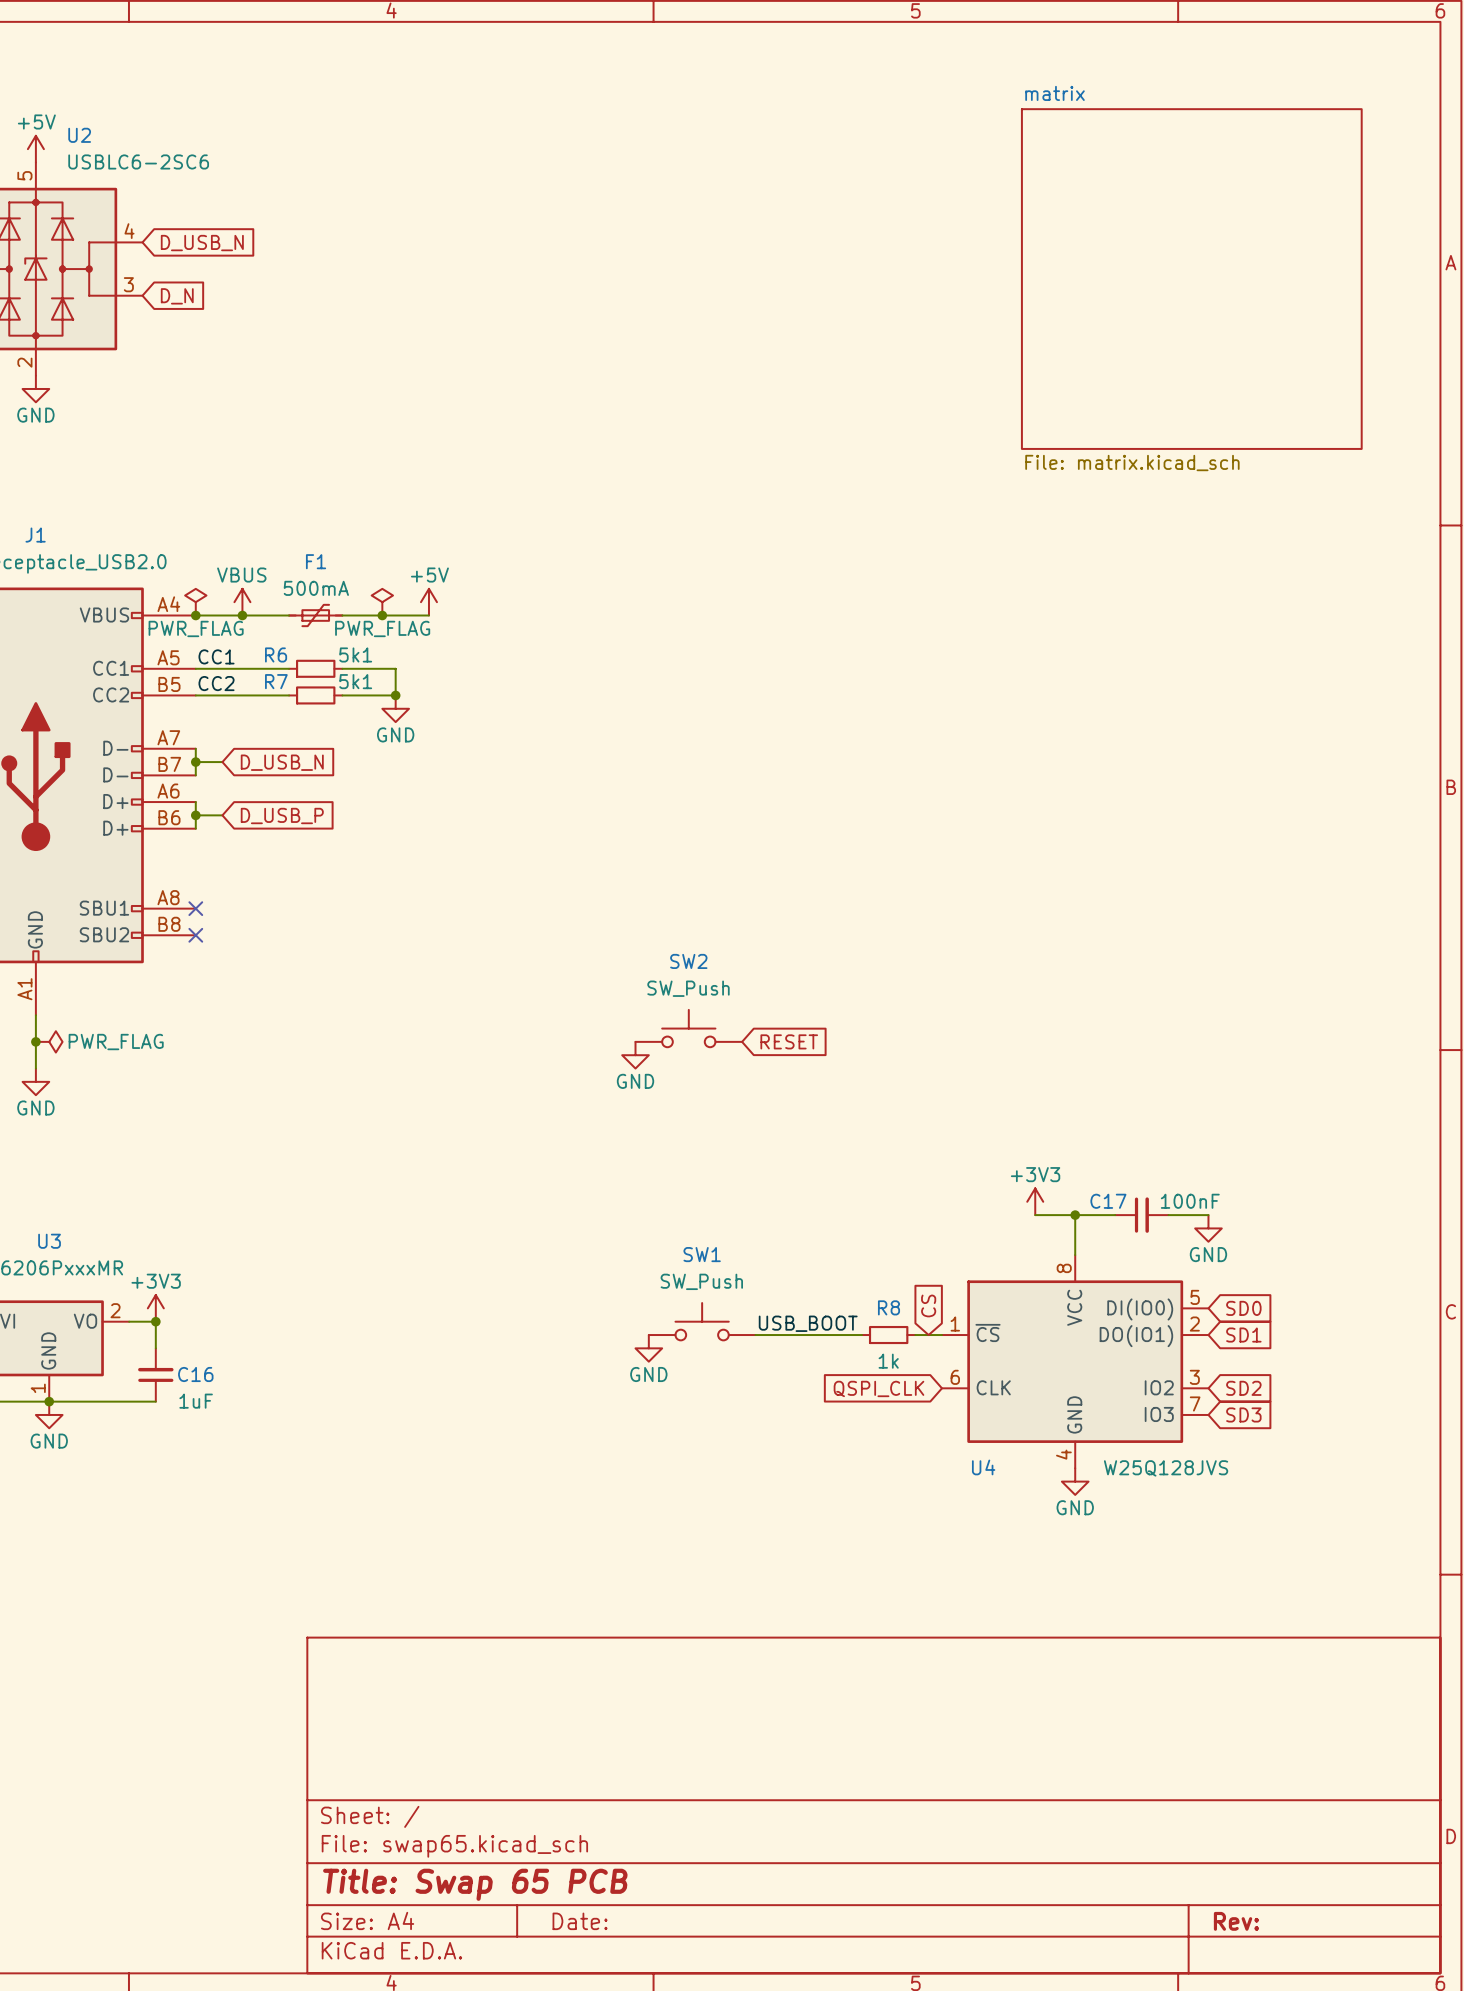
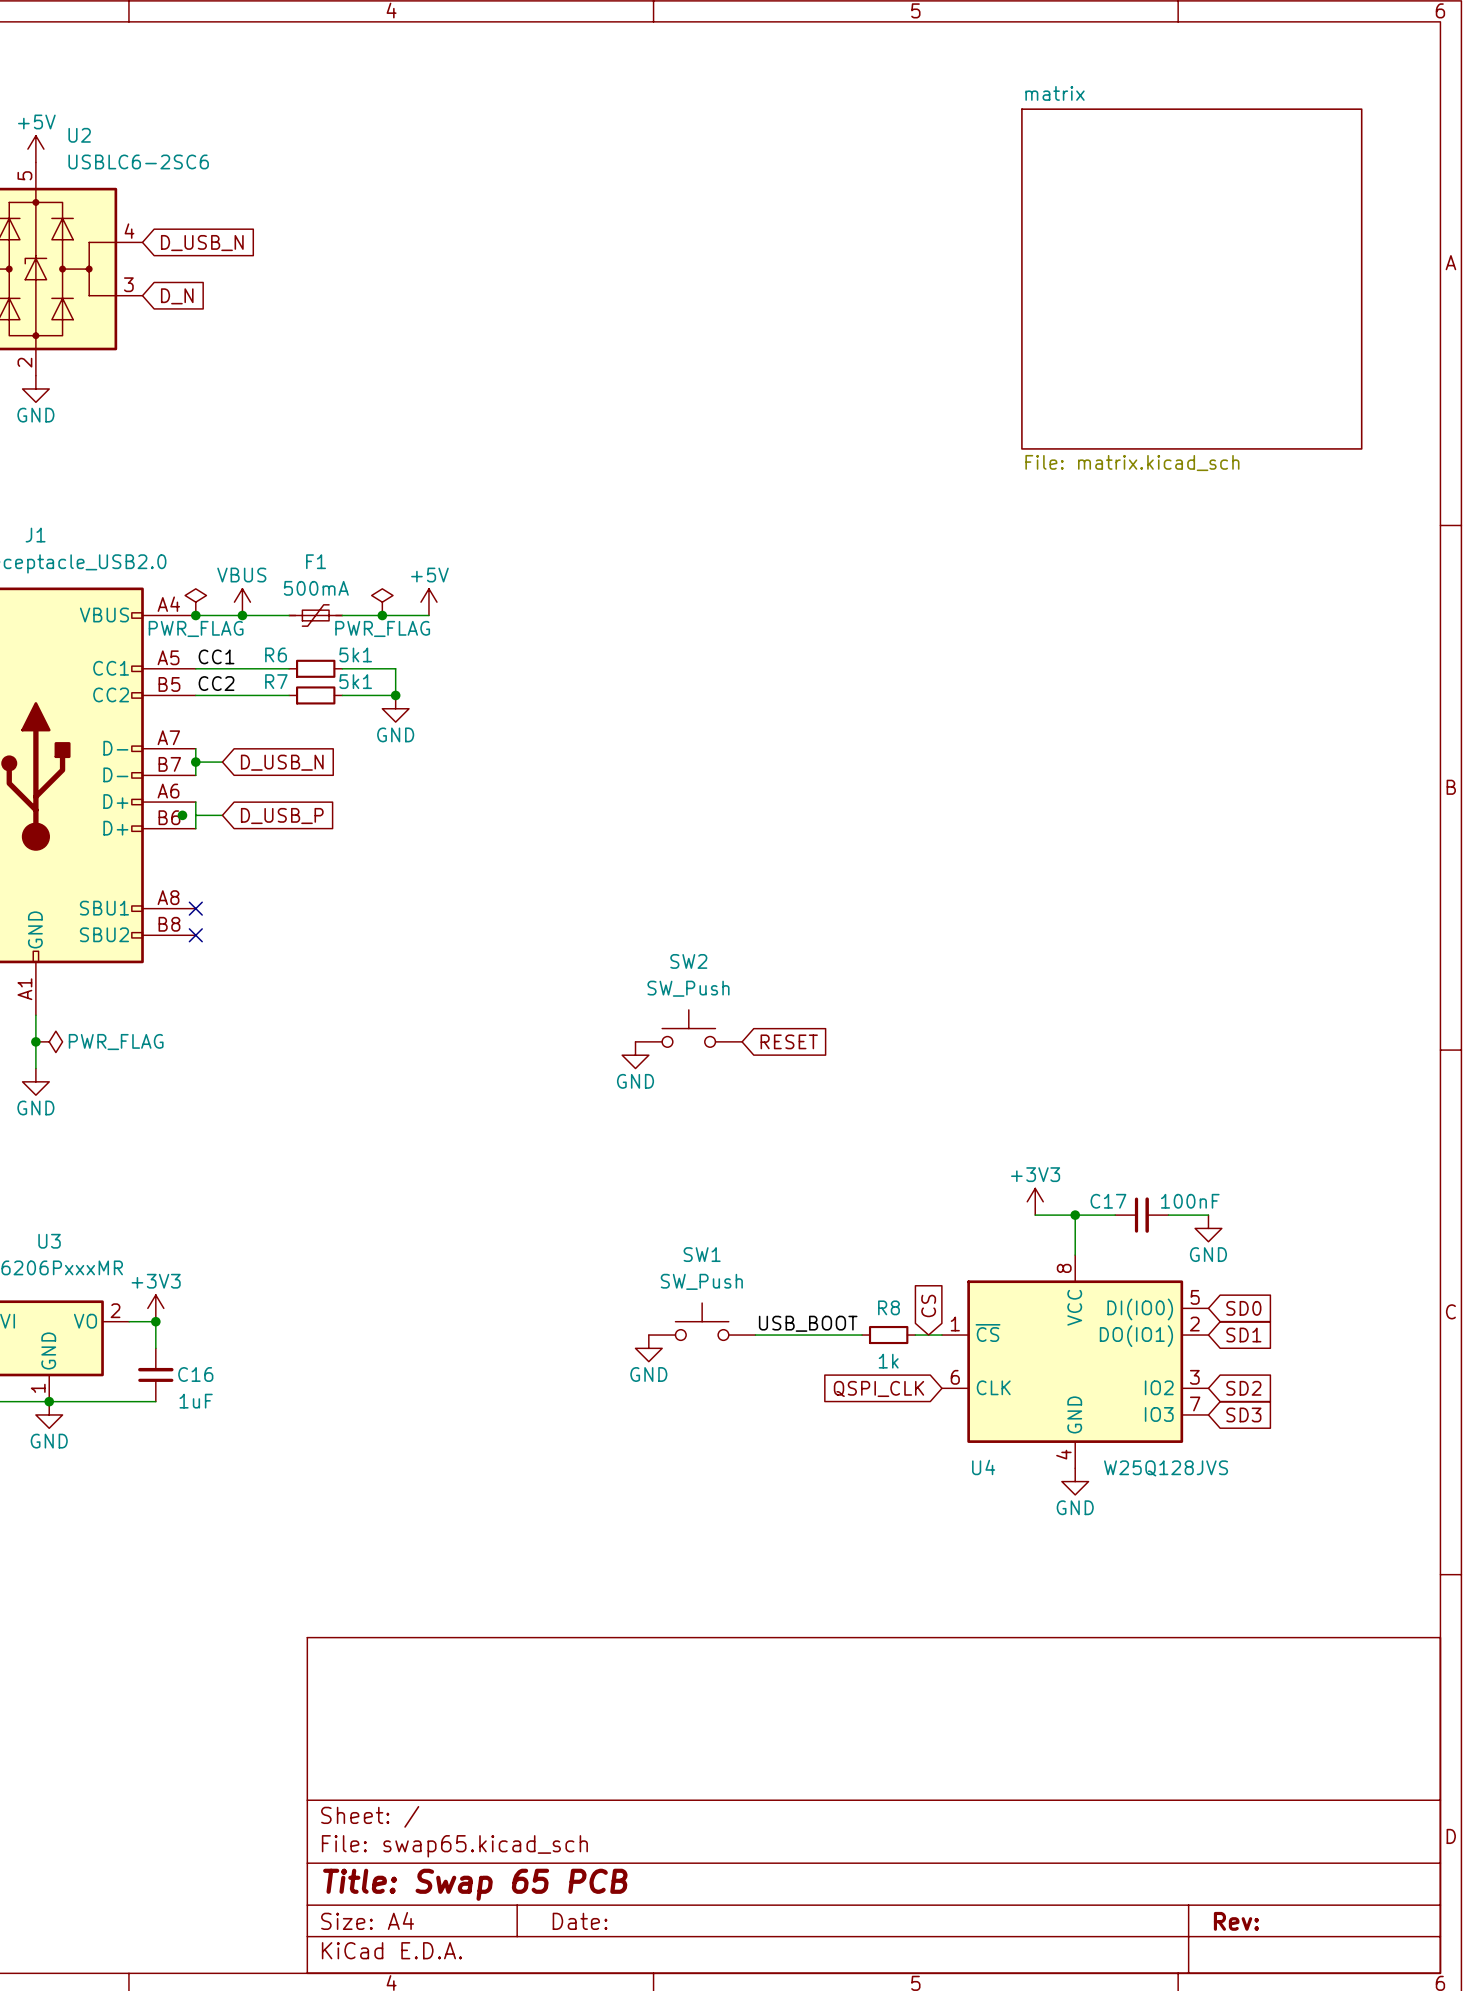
junction position: (195, 815) -> (182, 815)

